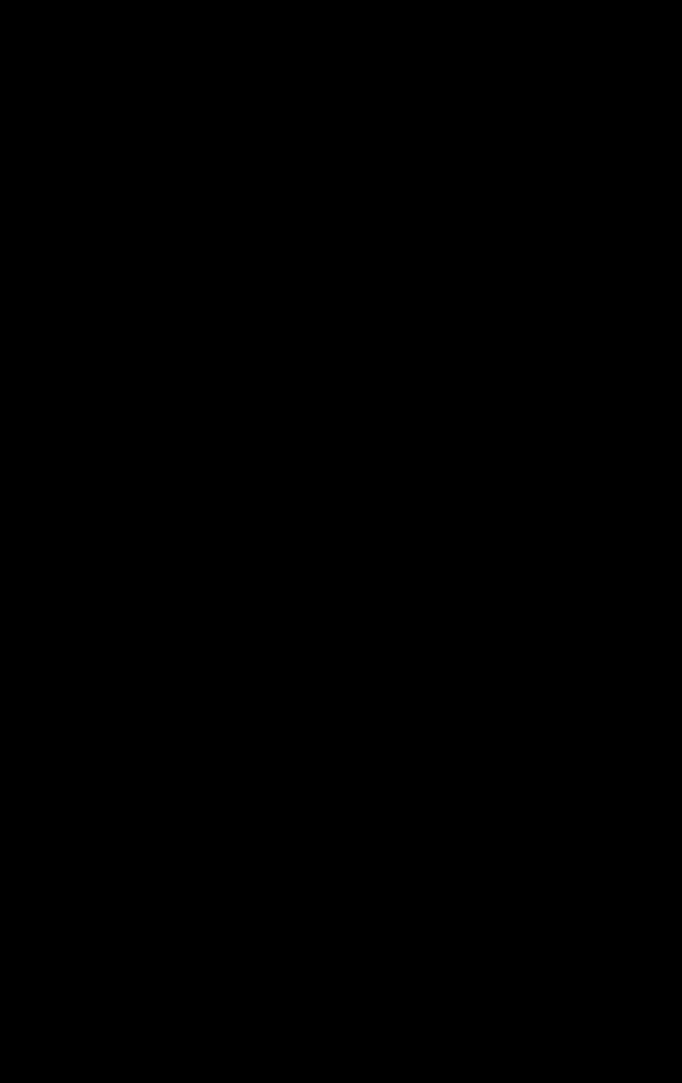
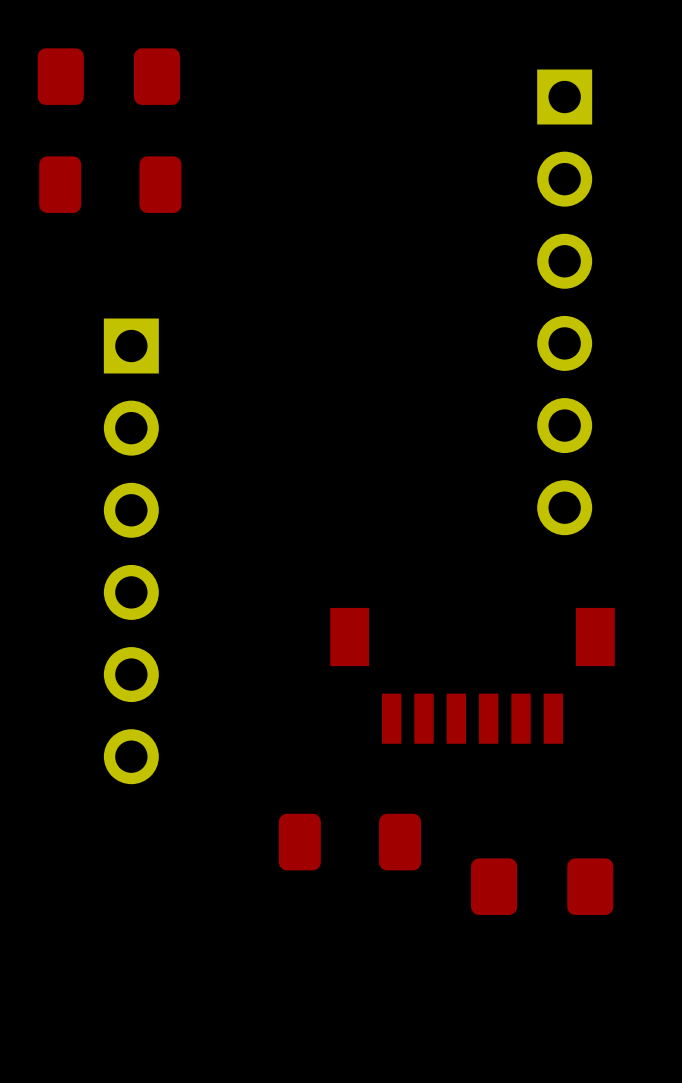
part: none -> (108, 76)
part: none -> (110, 184)
part: none -> (564, 302)
part: none -> (131, 551)
part: none -> (472, 675)
part: none -> (349, 842)
part: none -> (542, 886)

